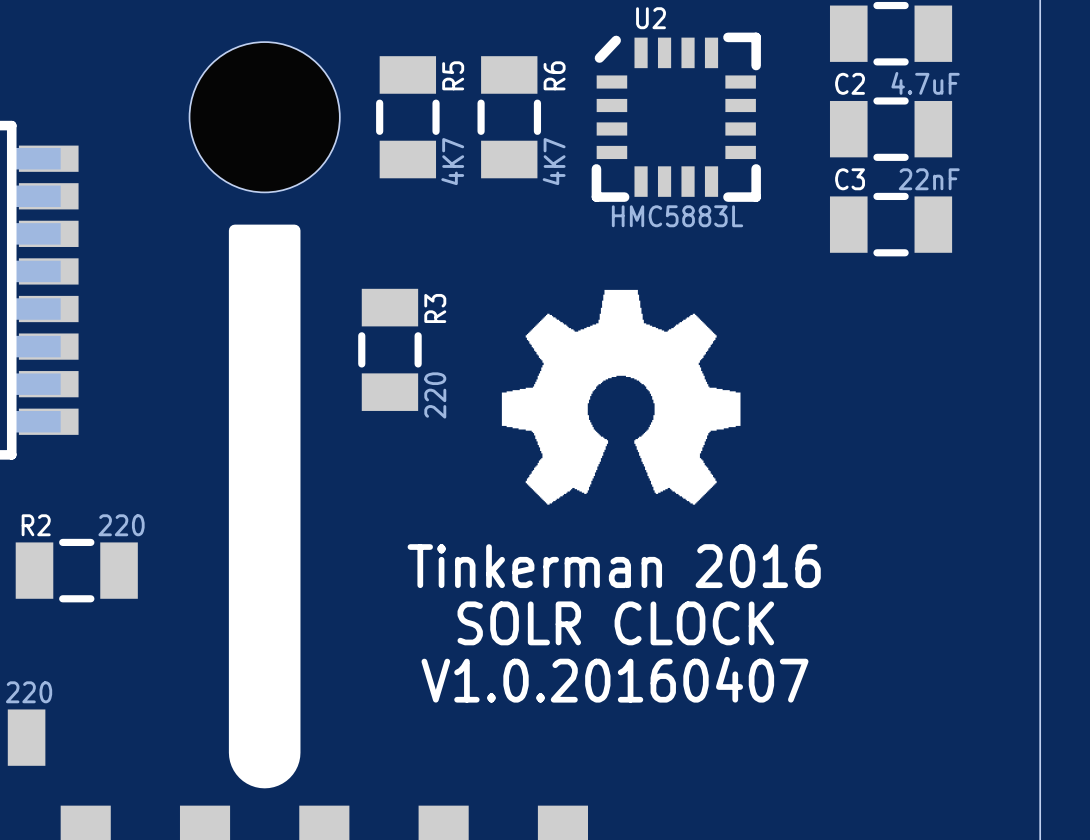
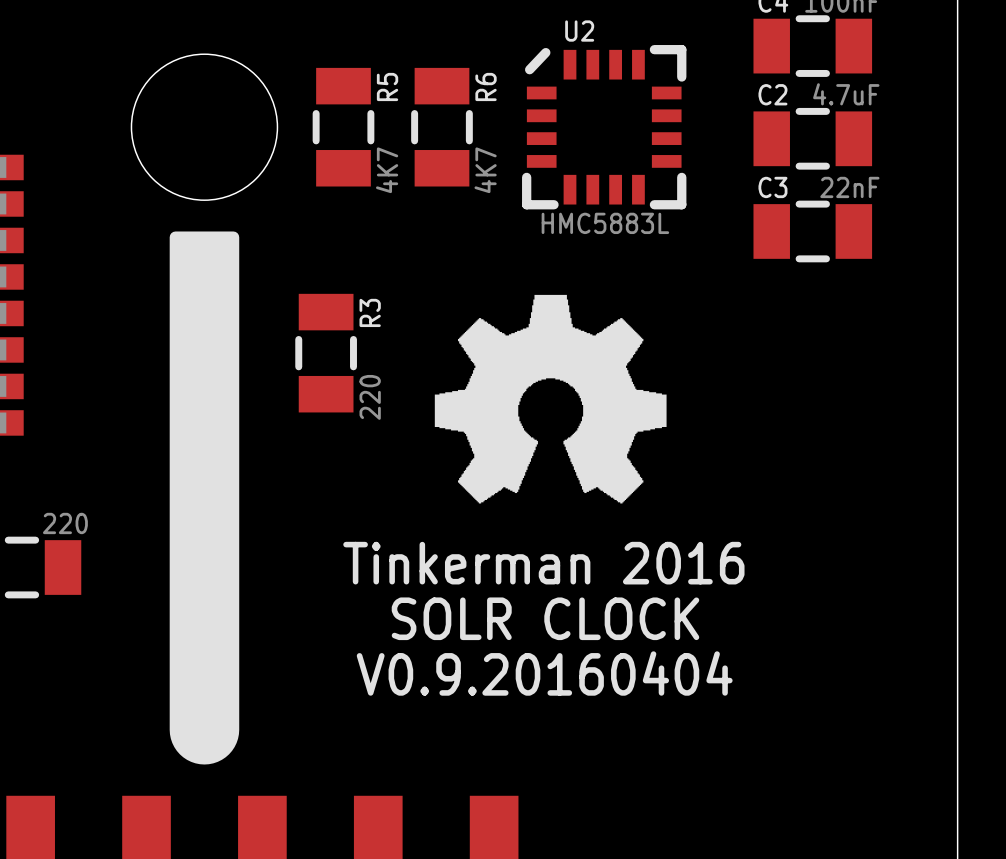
drawing shape: [228, 224, 301, 789] -> [169, 231, 240, 765]
text: V1.0.20160407 (615, 679) -> V0.9.20160404 (544, 673)

